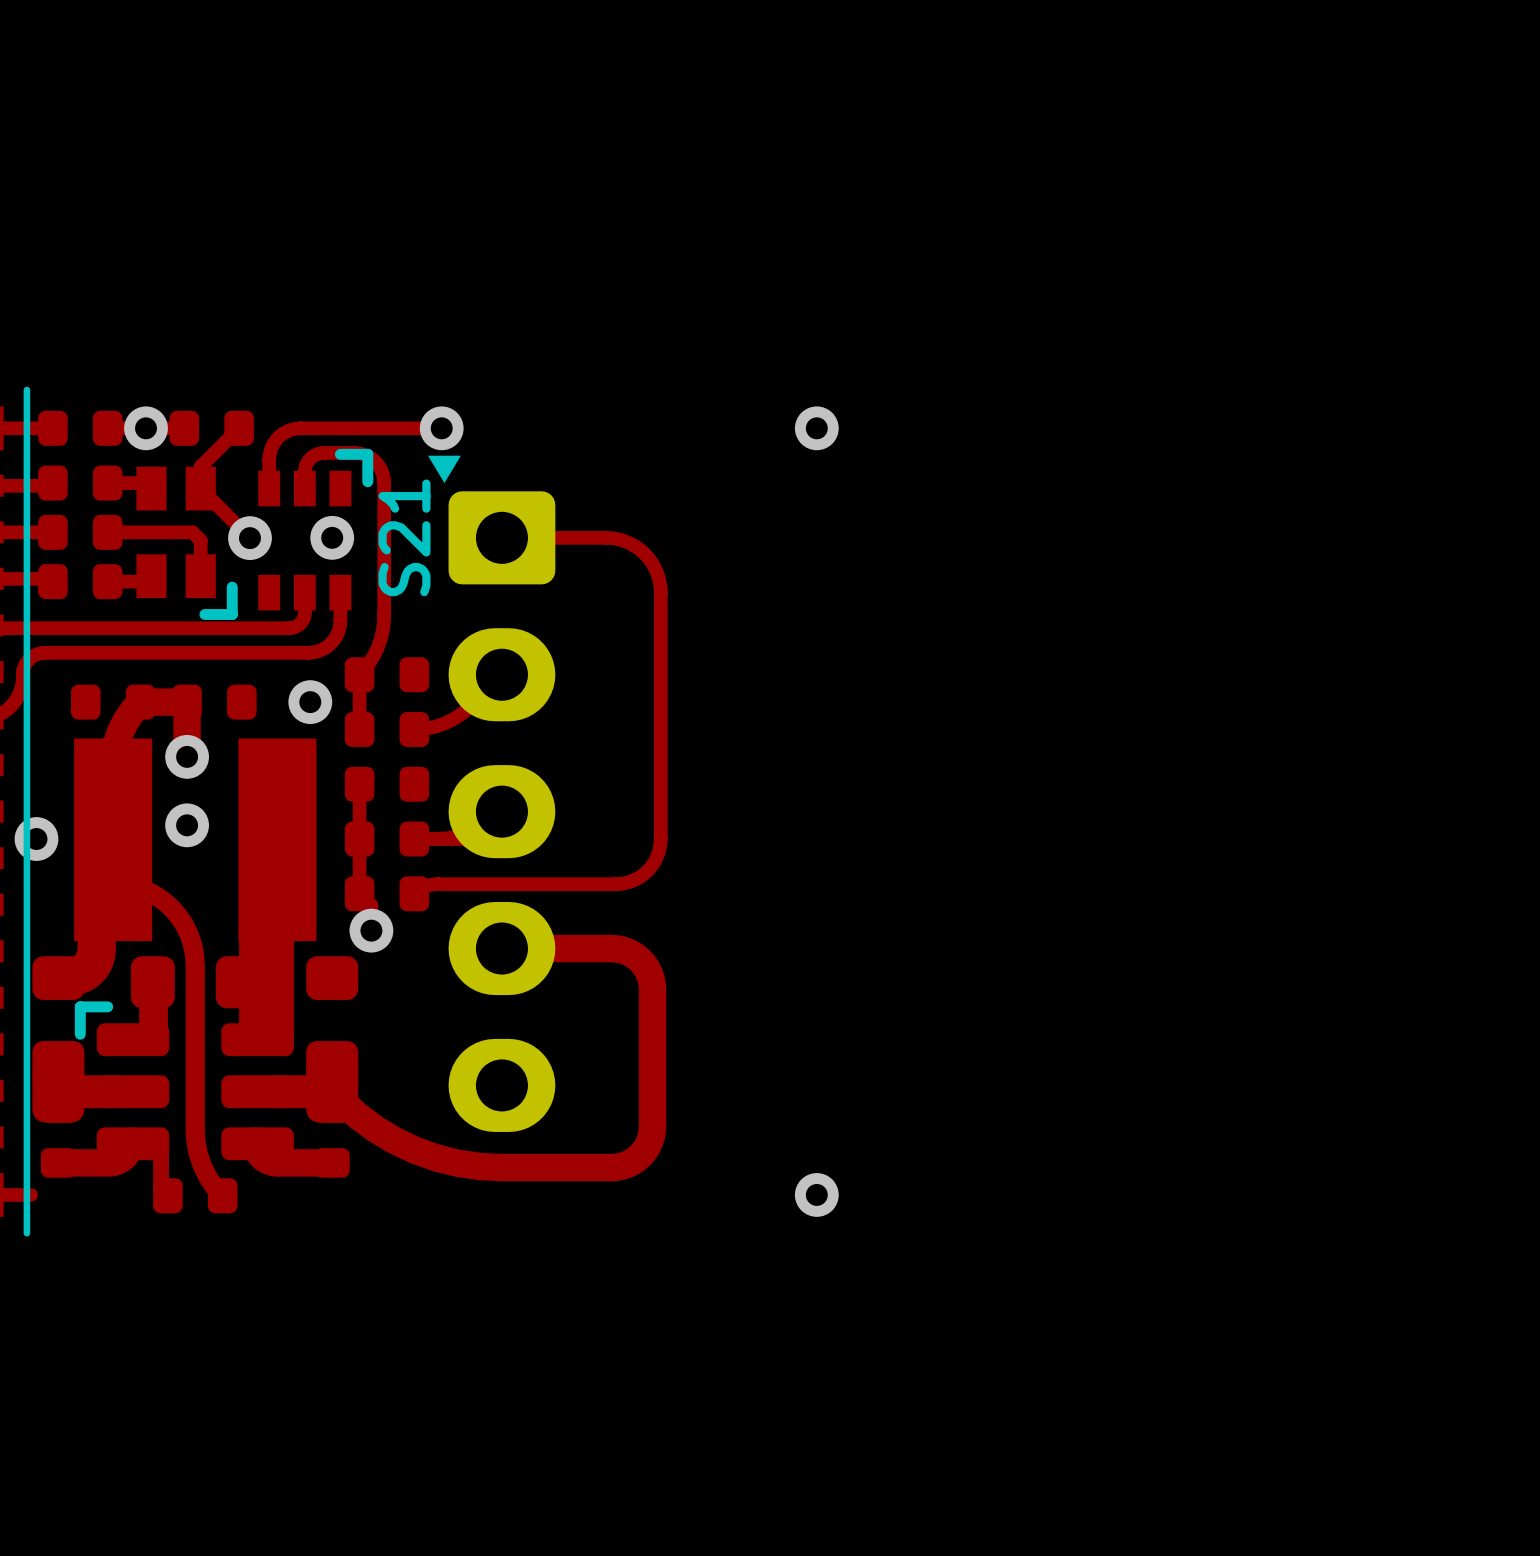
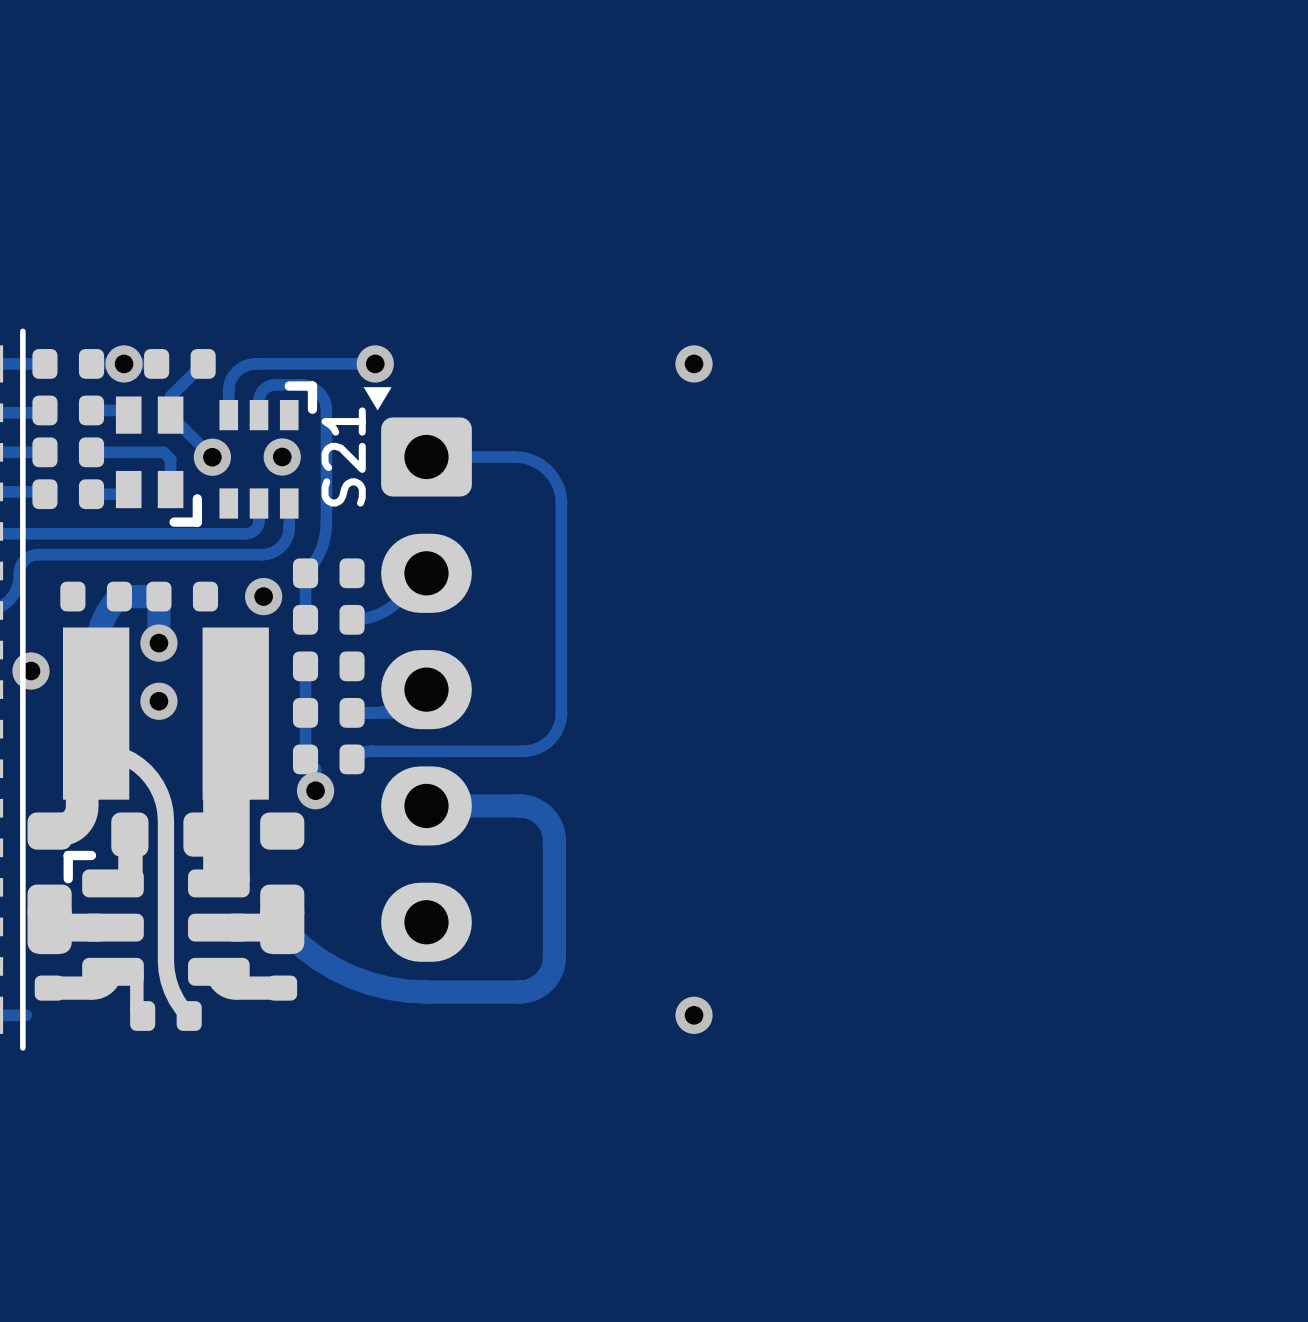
via position: (36, 839) -> (31, 671)

